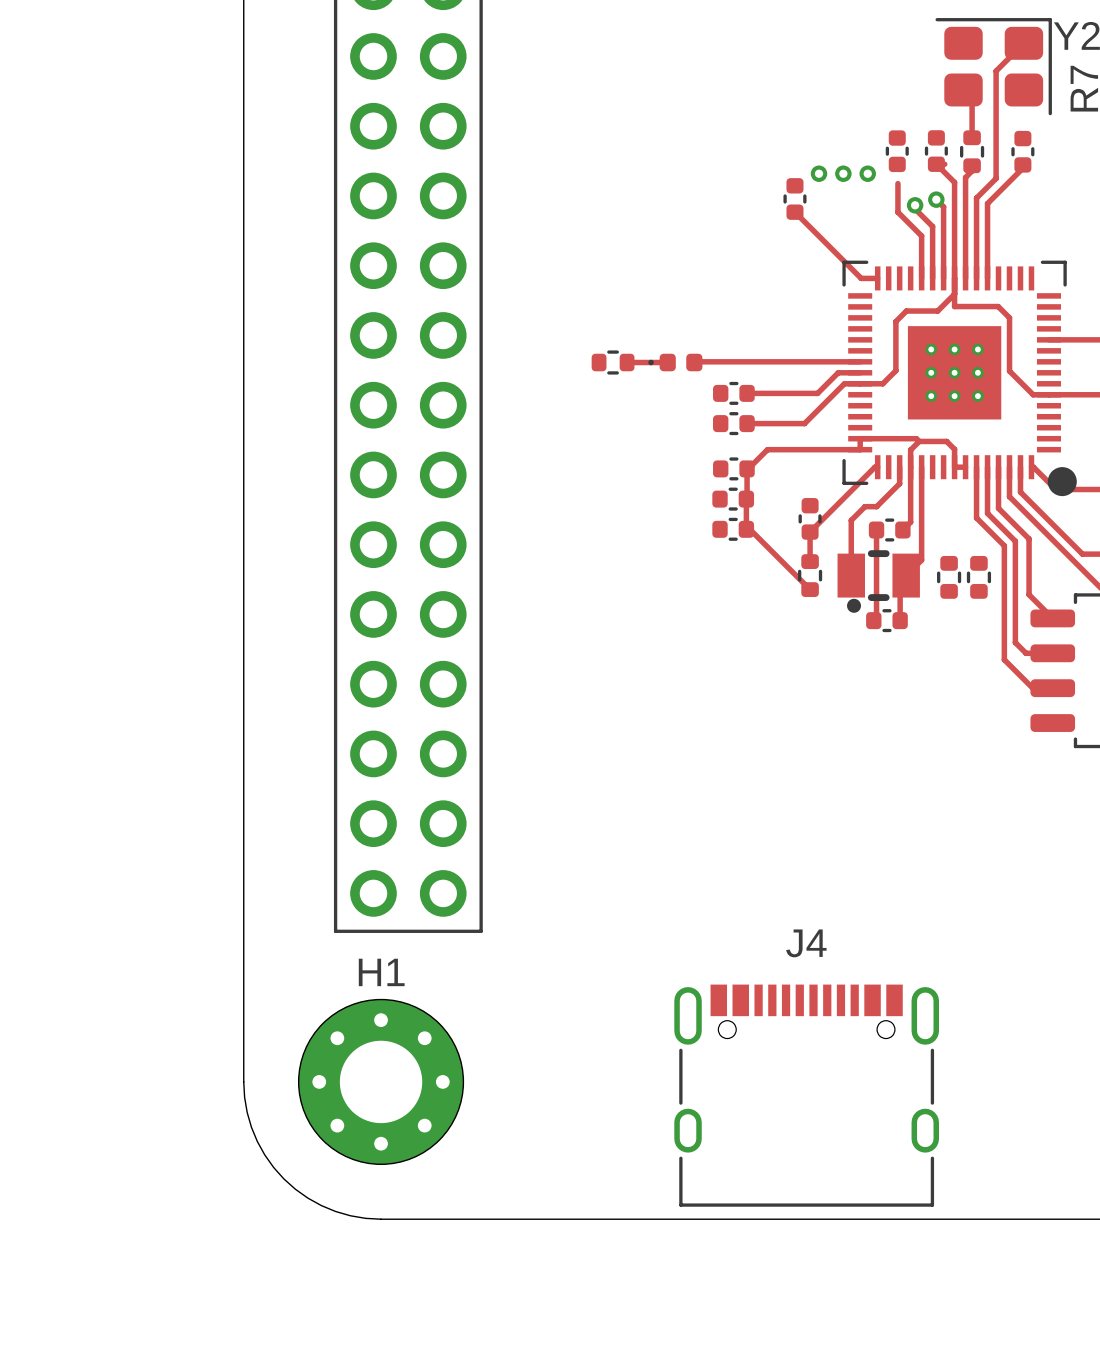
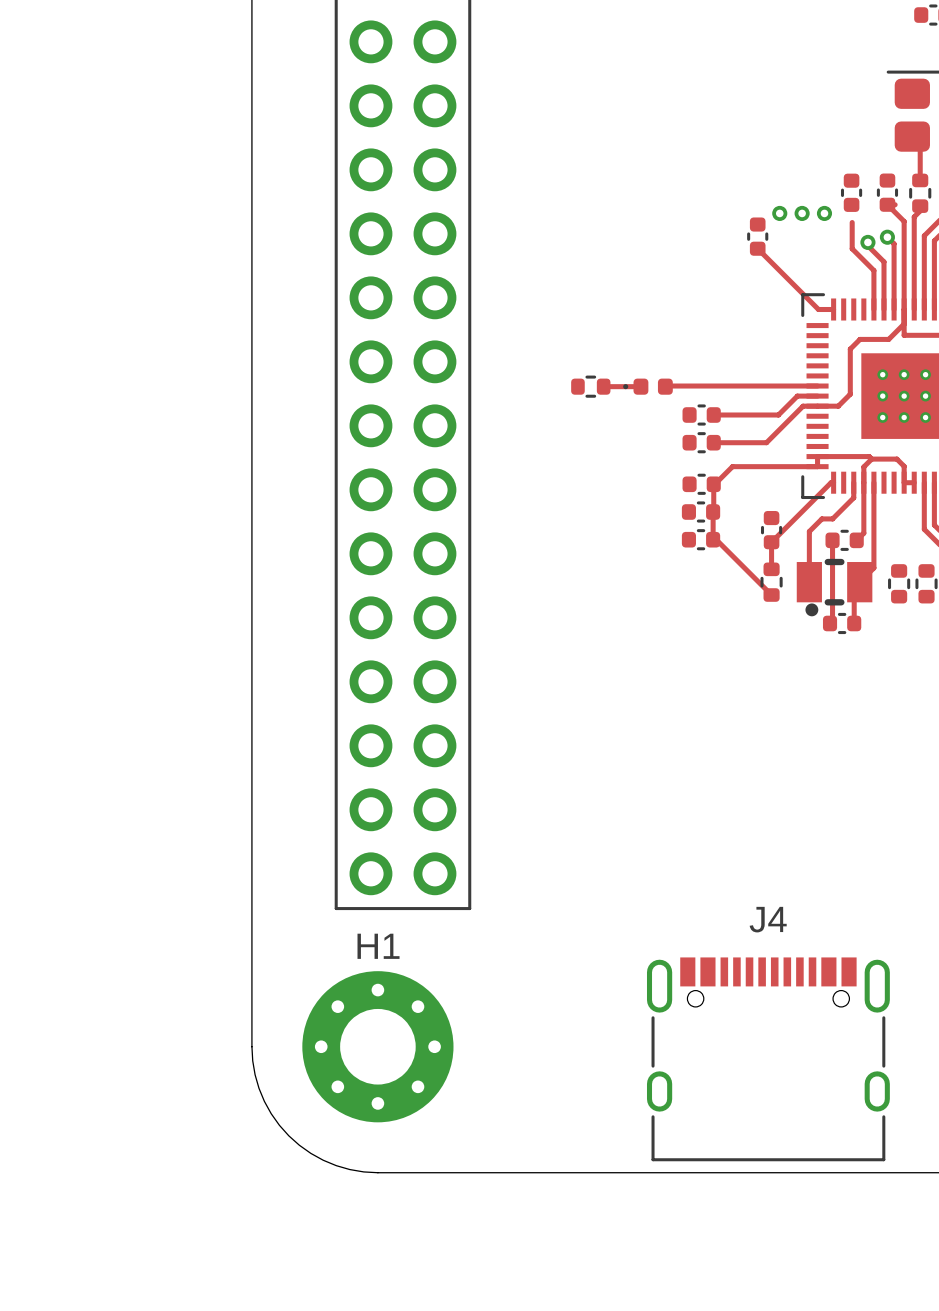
round board edge: [297, 998, 465, 1165] -> none

